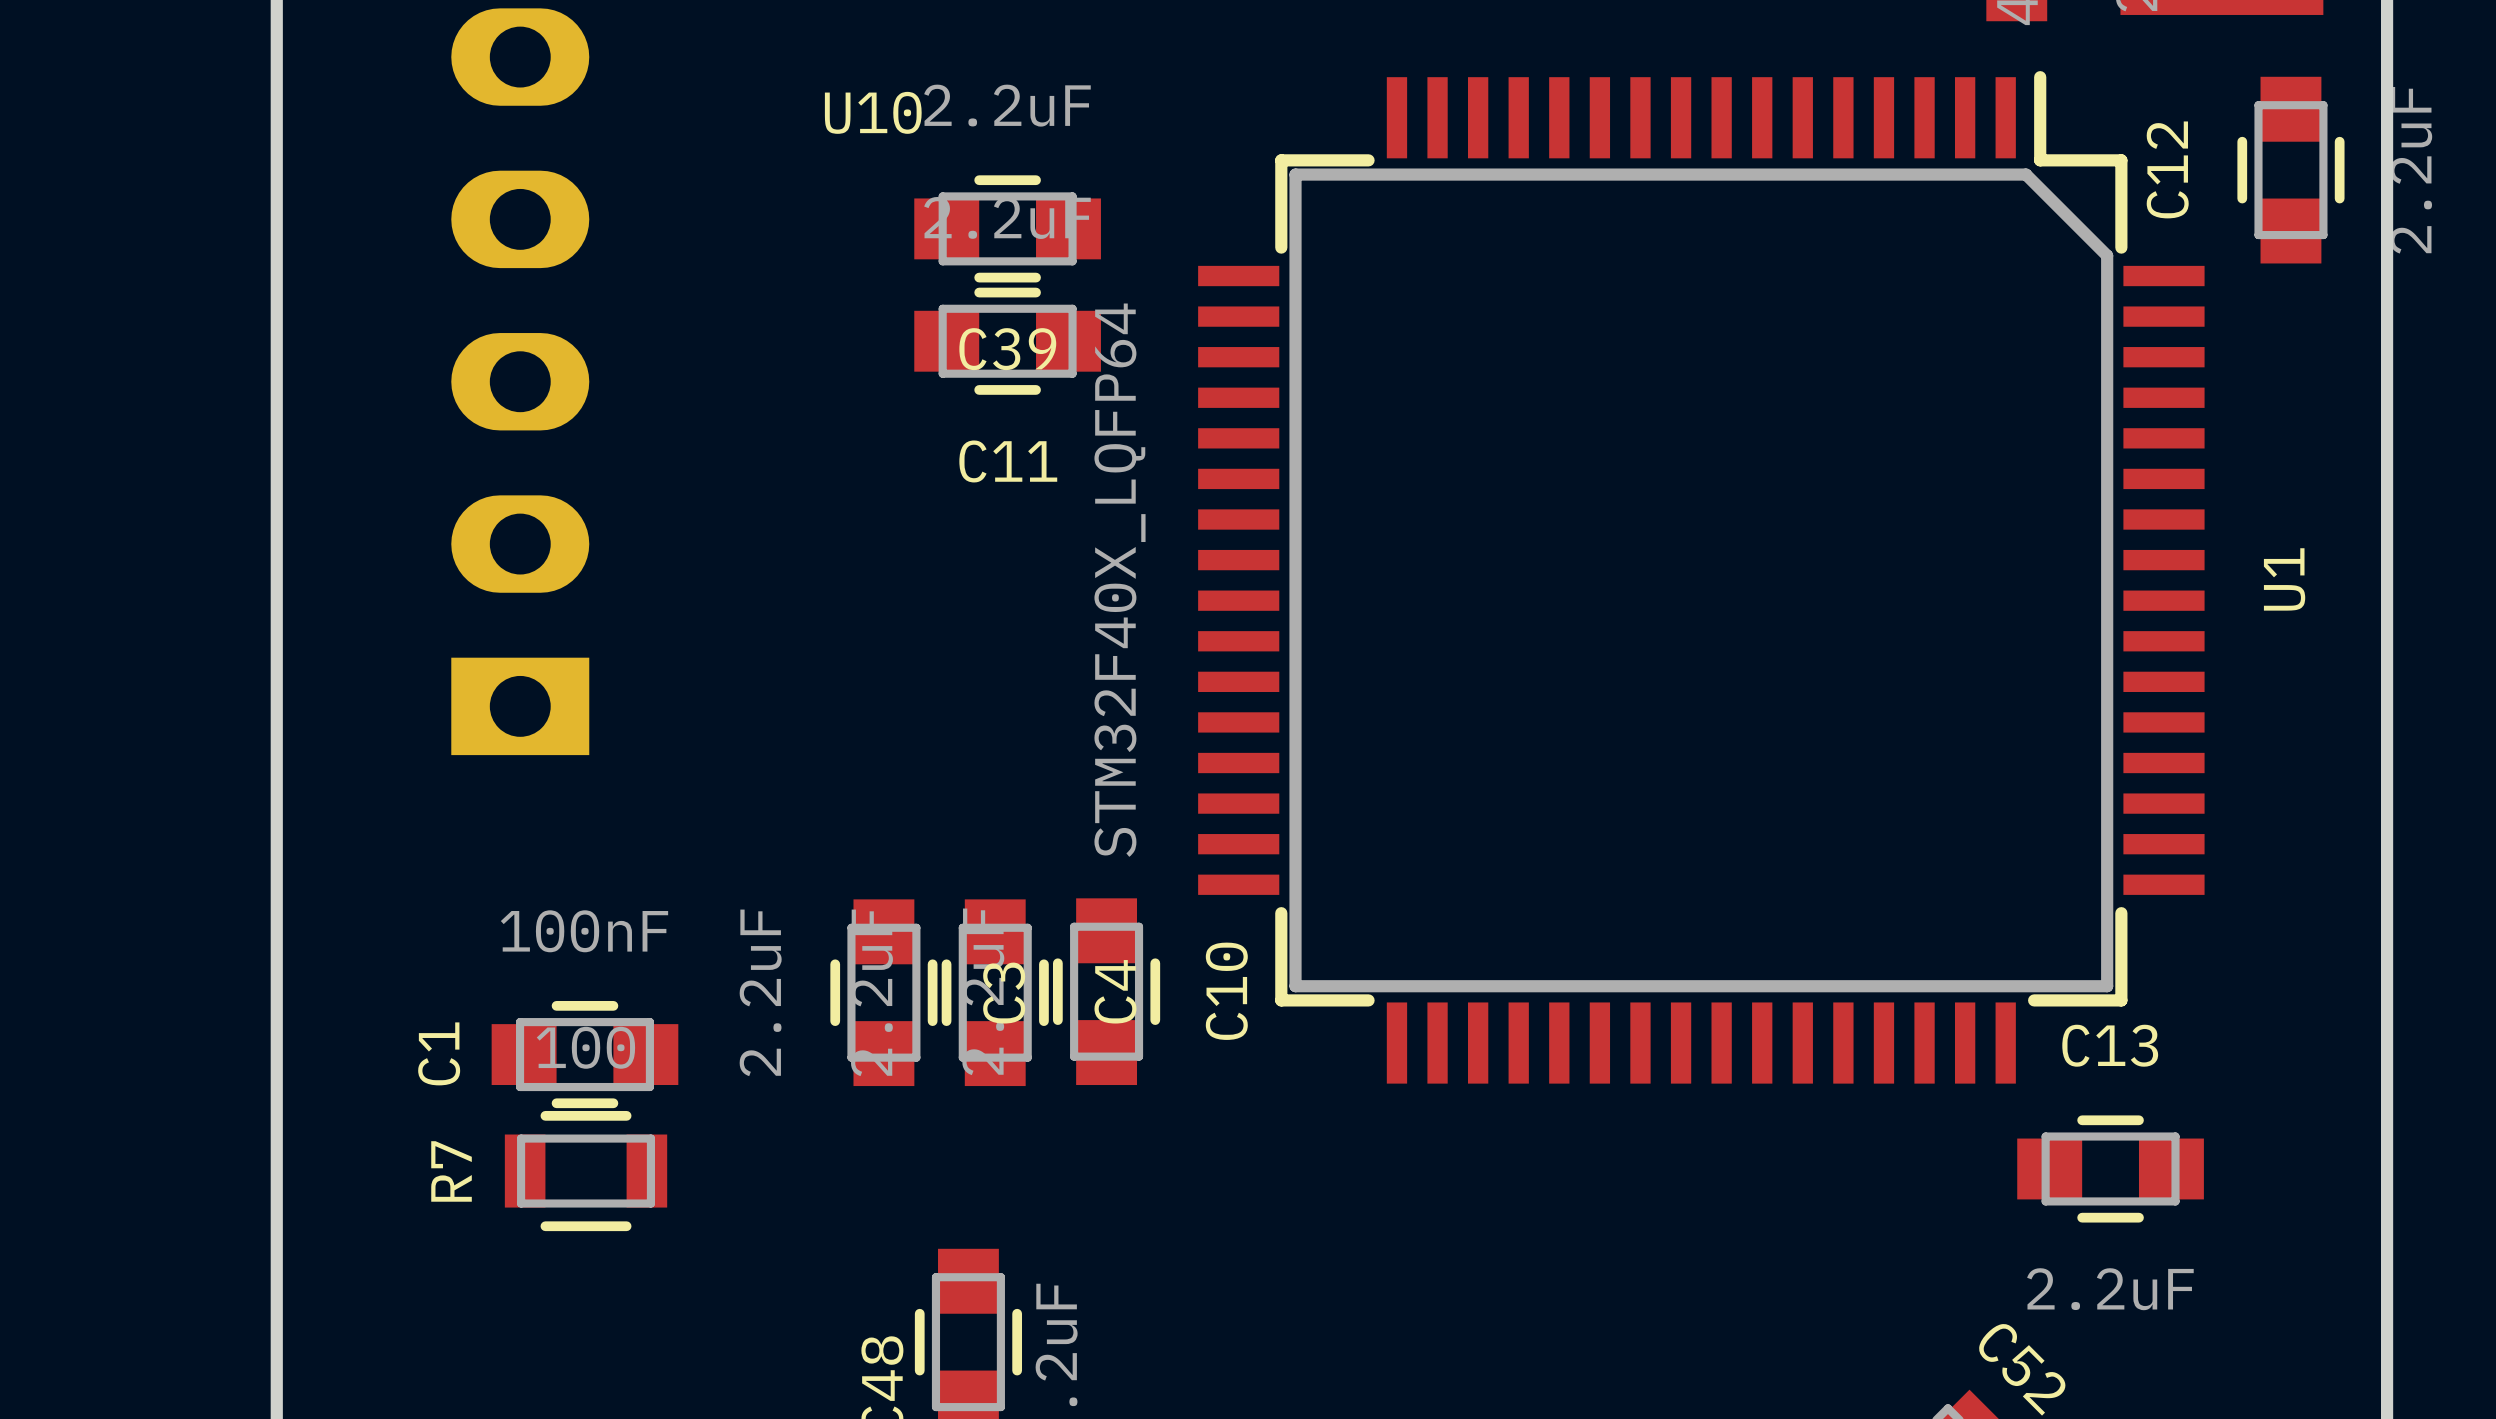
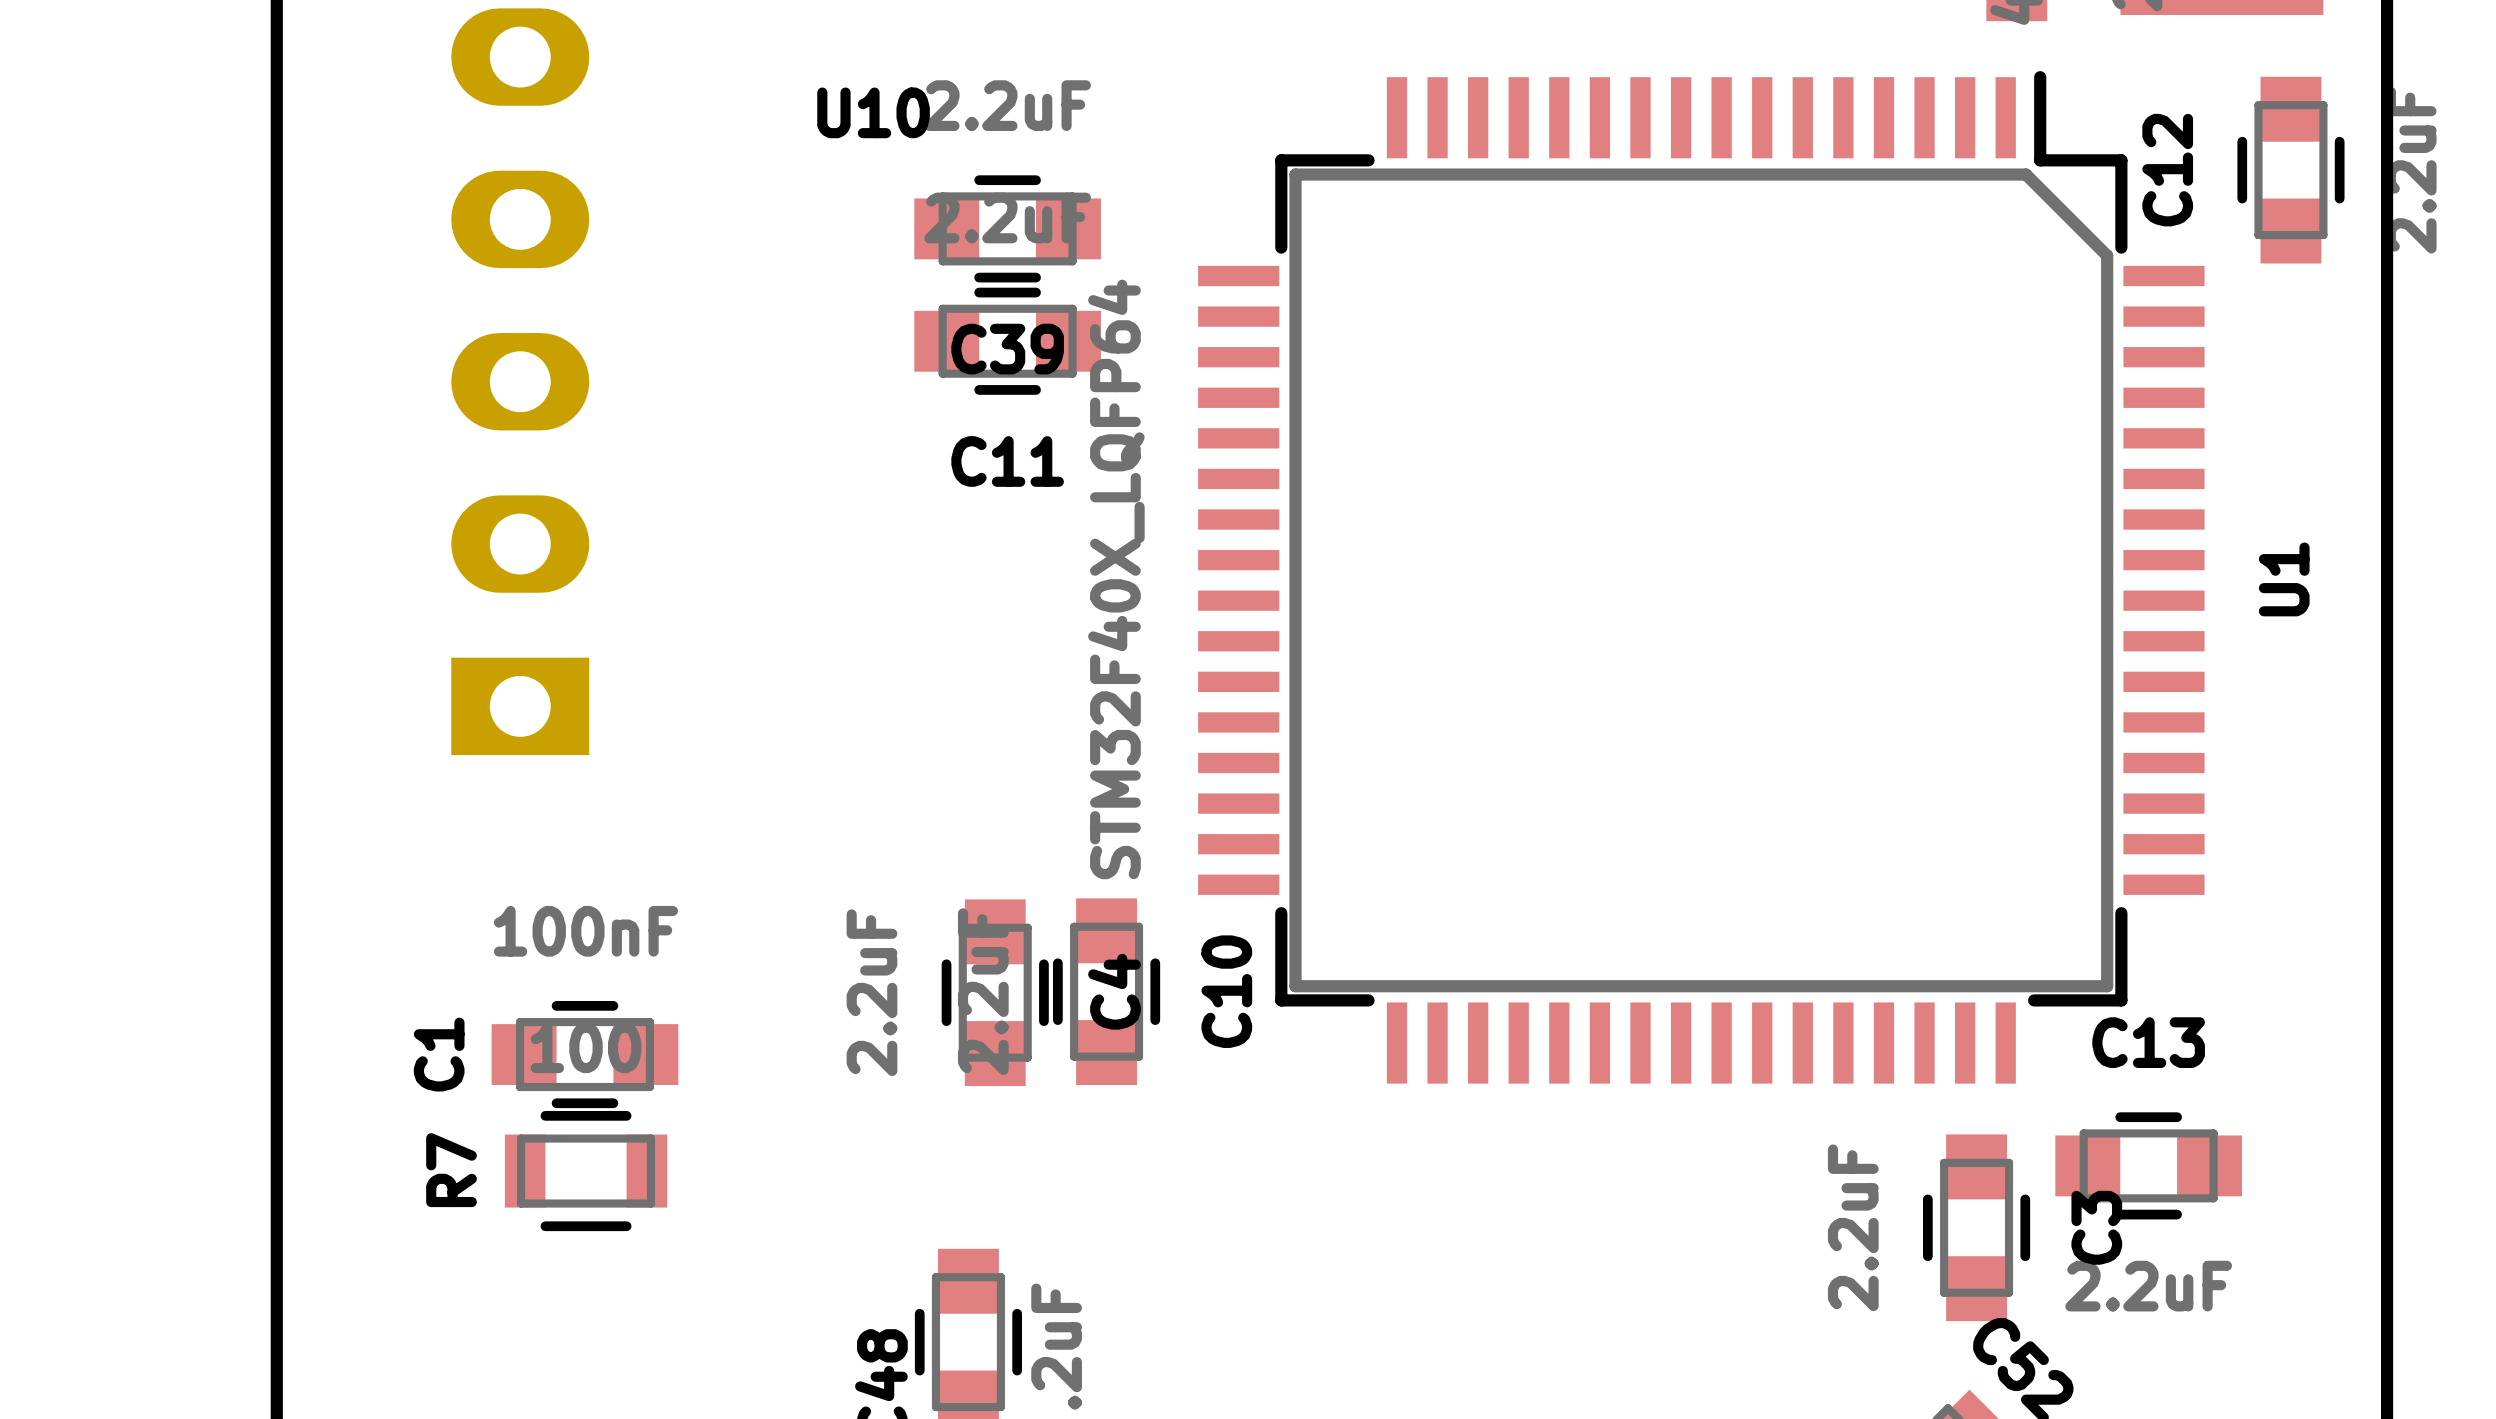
C3 position: (883, 992) -> (1976, 1227)
C13 position: (2110, 1168) -> (2148, 1165)

